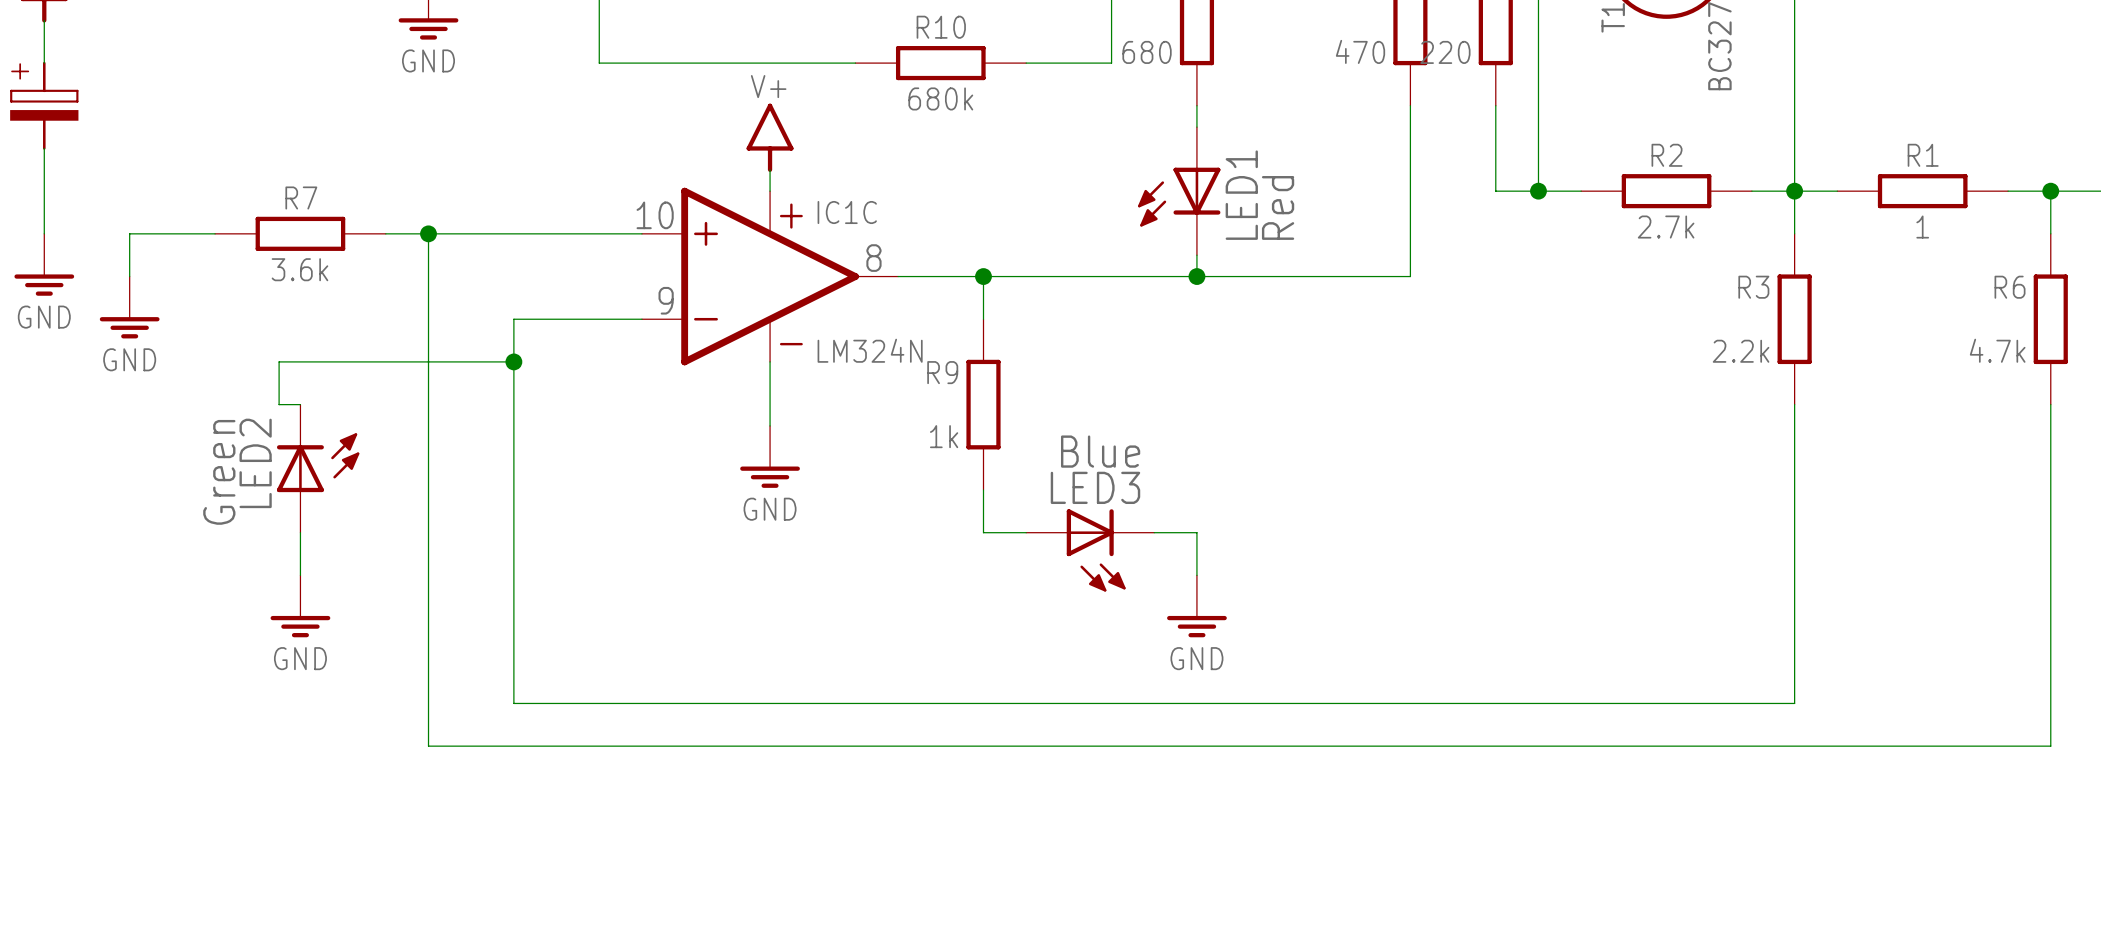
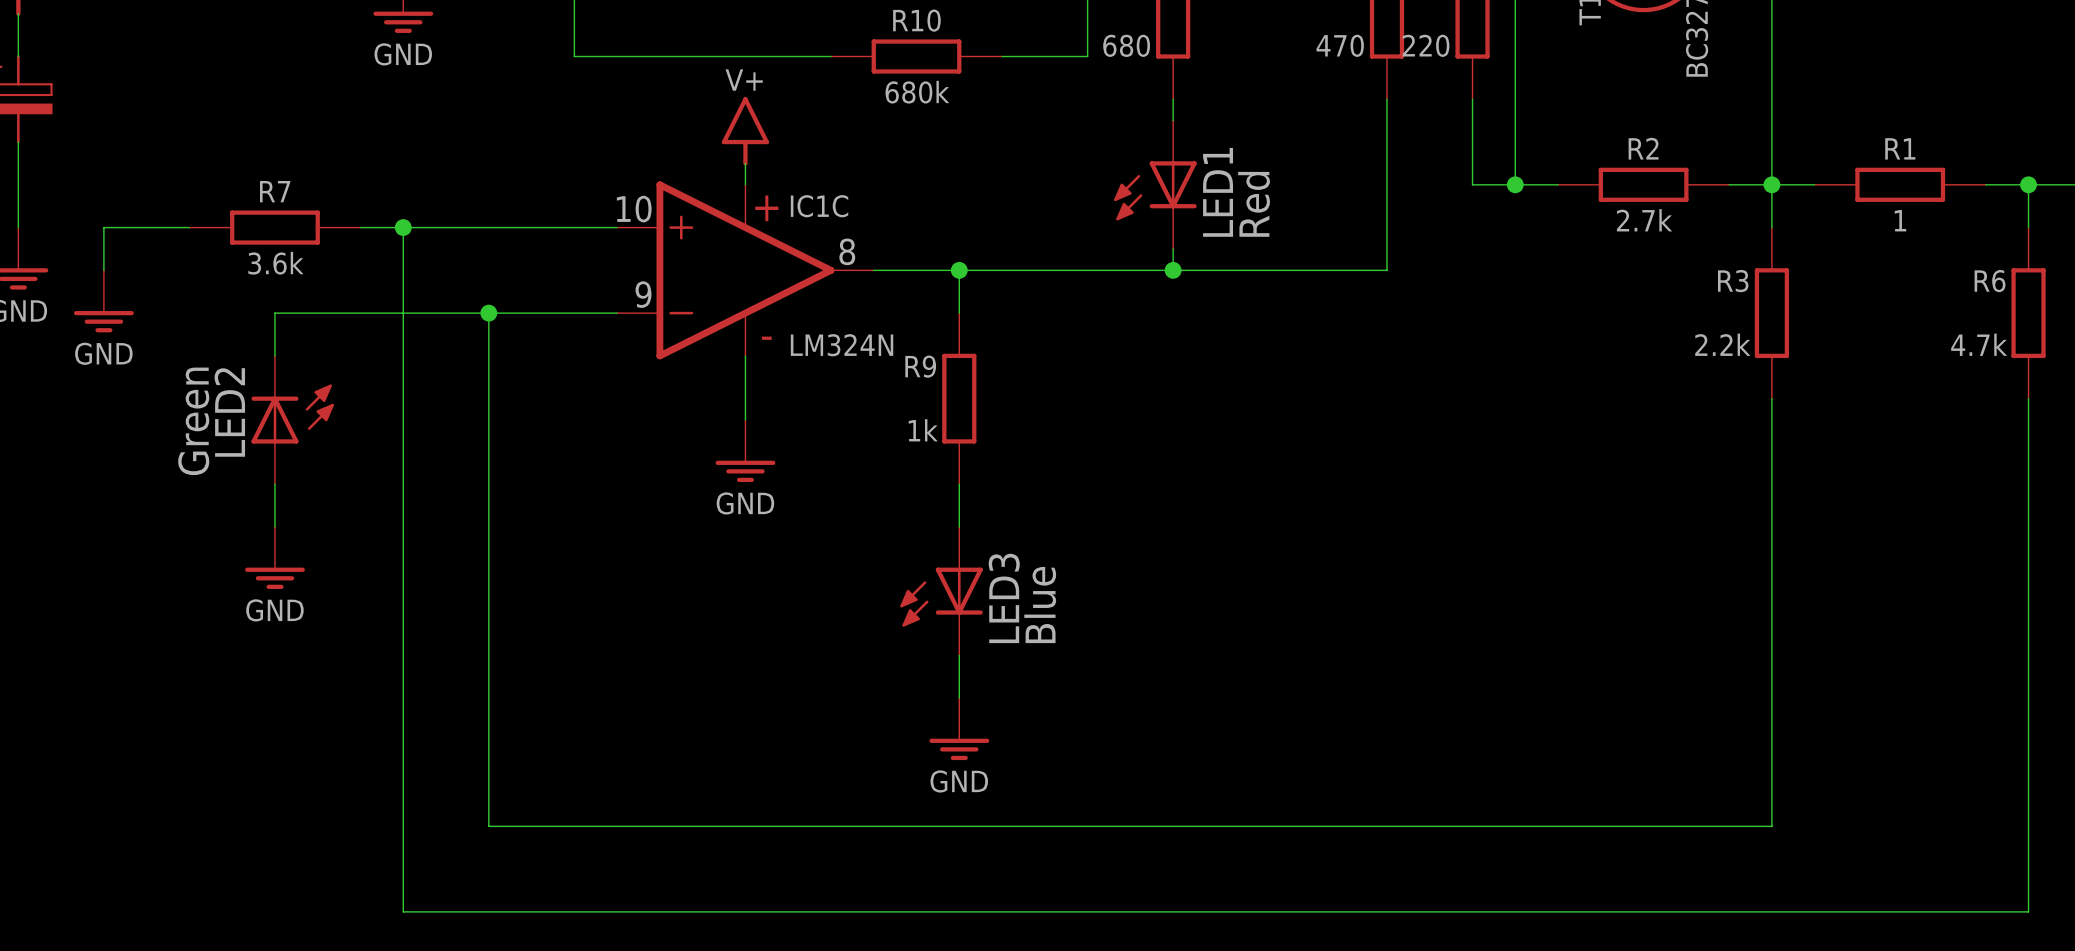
wire: none -> (488, 313) (274, 313) (274, 355)
wire: (513, 361) (279, 361) (279, 404) (300, 404) -> none
junction position: (513, 361) -> (488, 313)
LED2 position: (318, 468) -> (292, 420)
wire: (983, 532) (1026, 532) -> none
wire: (1154, 532) (1196, 532) (1196, 575) -> none
LED3 position: (1090, 550) -> (941, 591)
LED3 rotation: 0° (1096, 550) -> 90° clockwise (941, 597)
power symbol position: GND (300, 606) -> GND (274, 557)
power symbol position: GND (1196, 606) -> GND (959, 729)
wire: none -> (959, 655) (959, 698)
wire: (513, 703) (1794, 703) -> (488, 698) (488, 826) (1771, 826) (1771, 698)
wire: (428, 746) (2050, 746) -> (403, 740) (403, 911) (2028, 911) (2028, 740)

